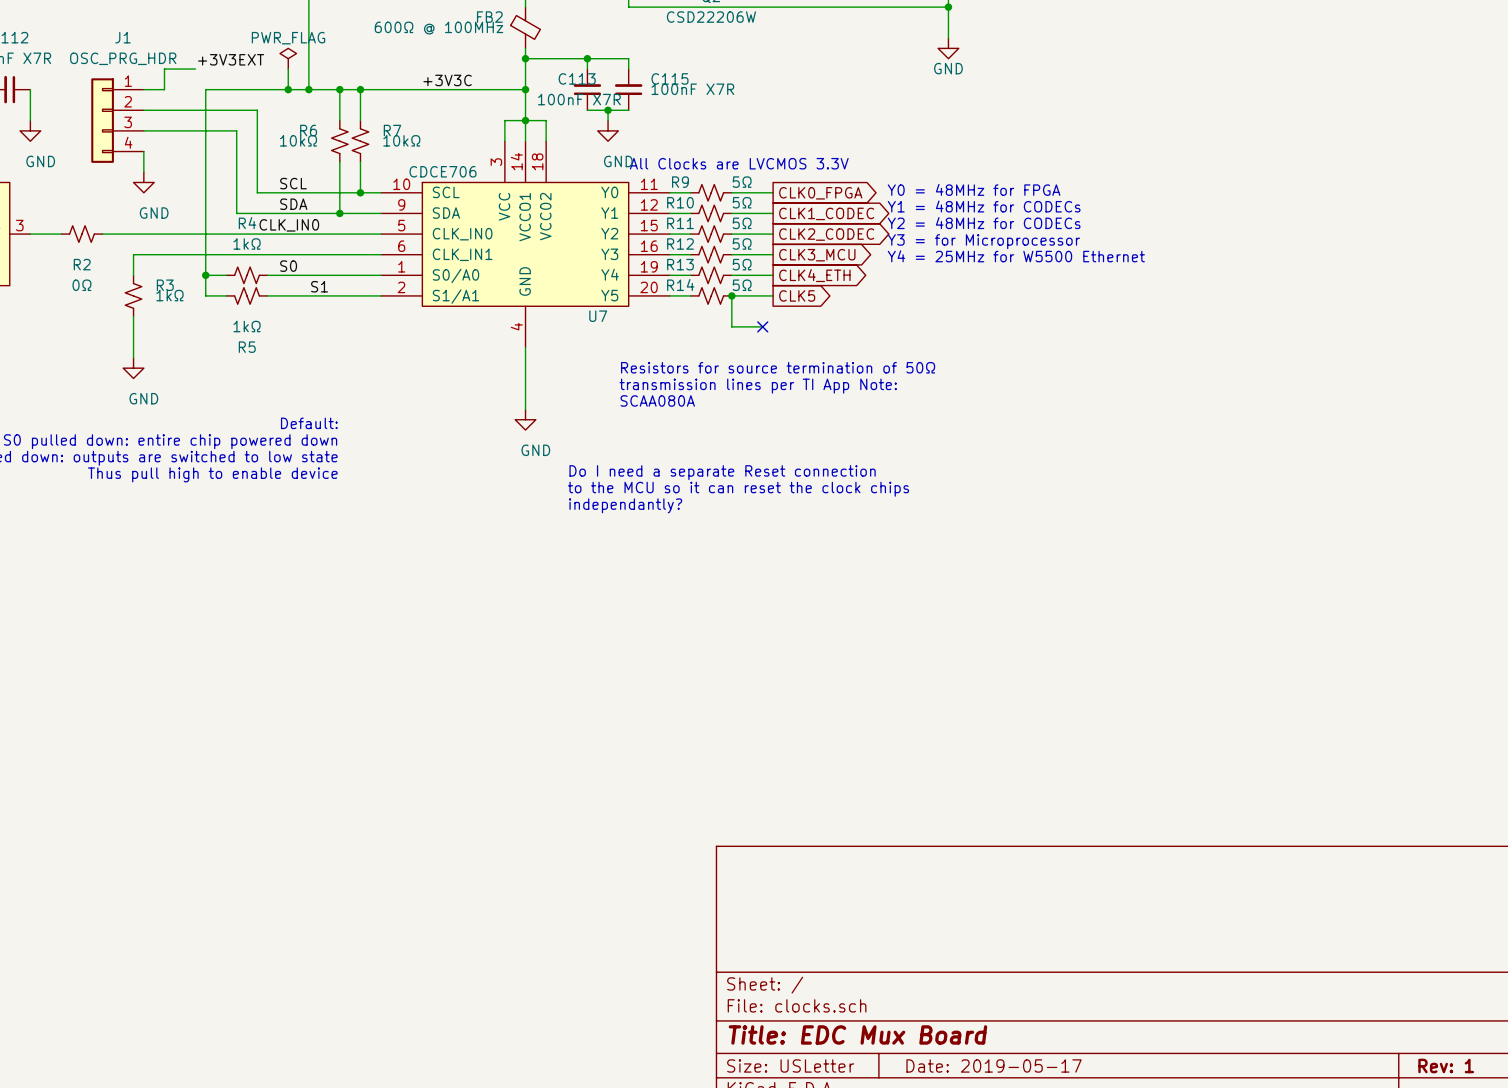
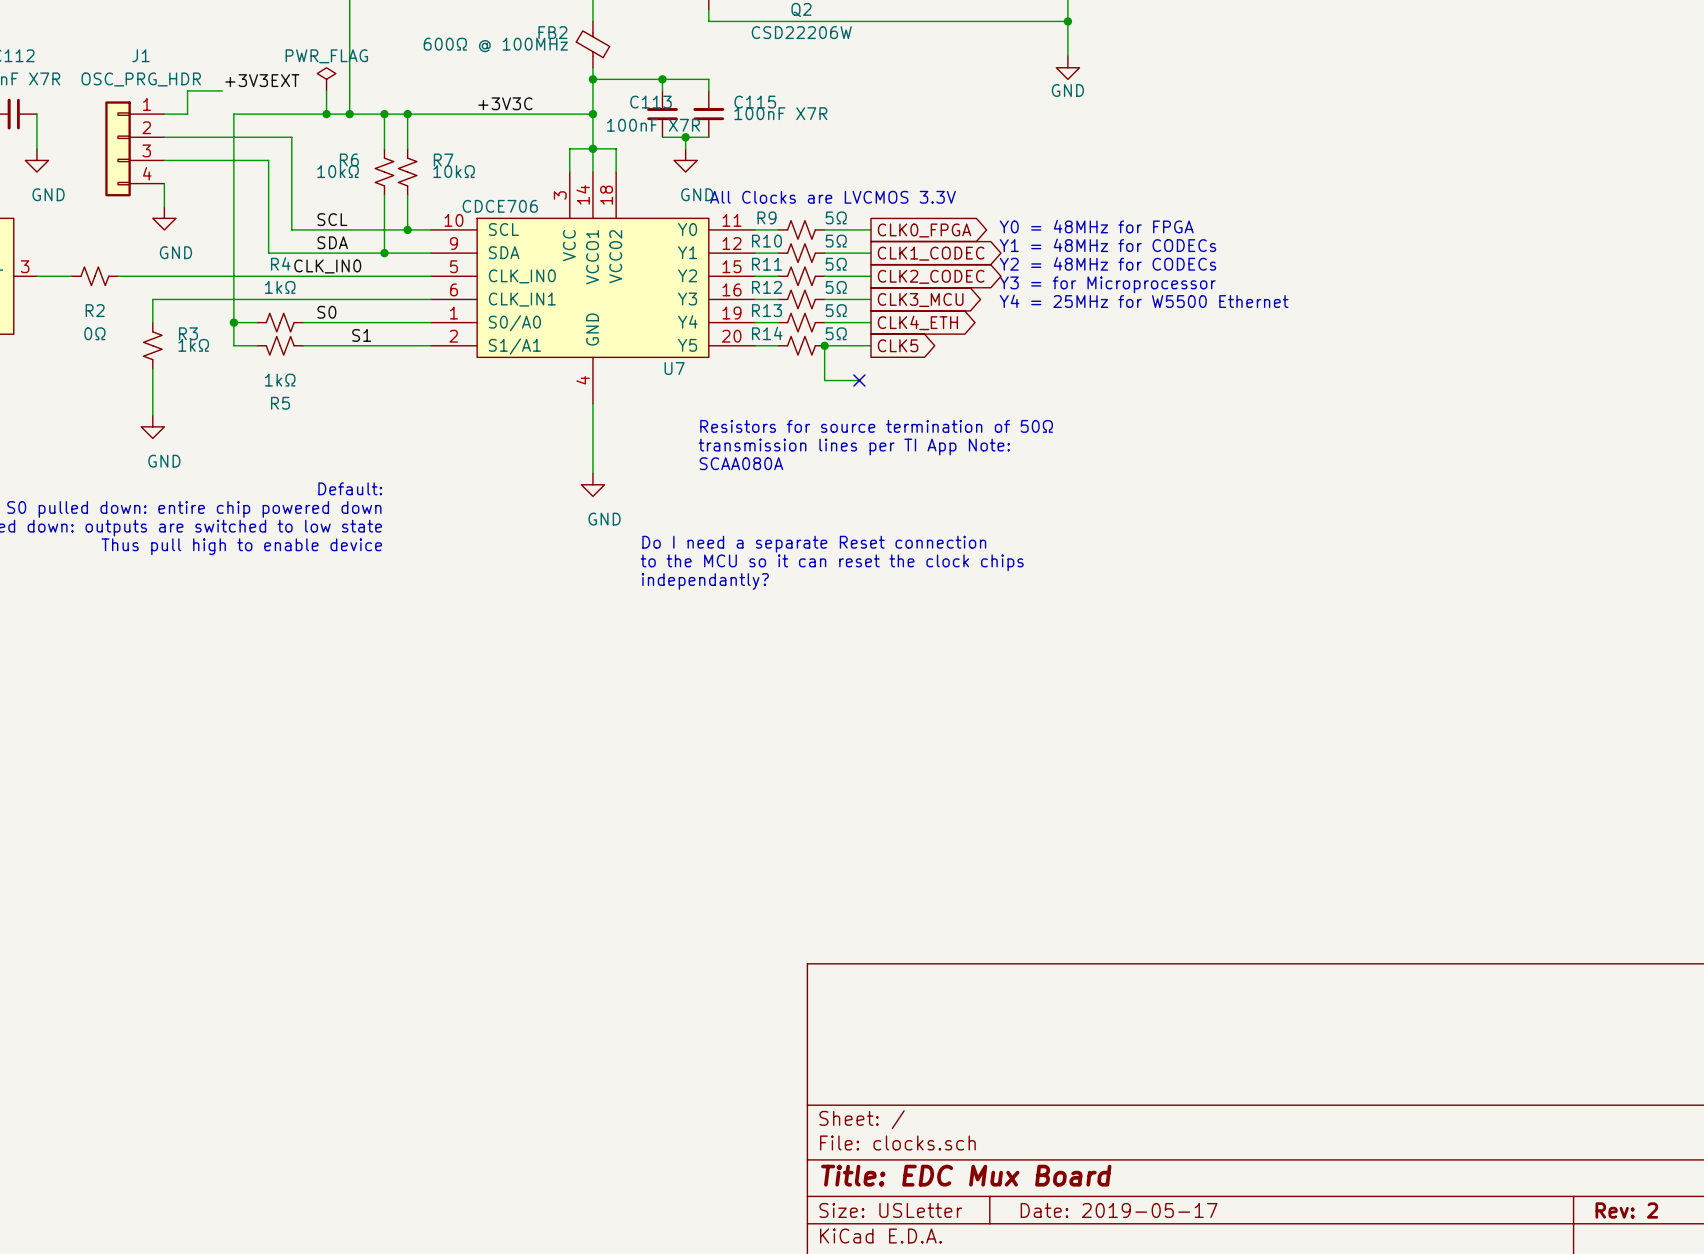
title block: Rev: 1 (1446, 1065) -> Rev: 2 (1626, 1210)

